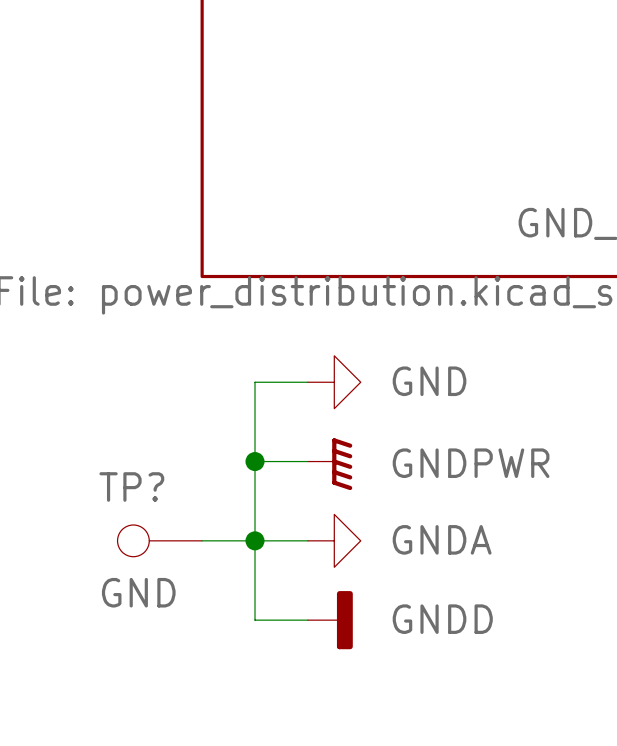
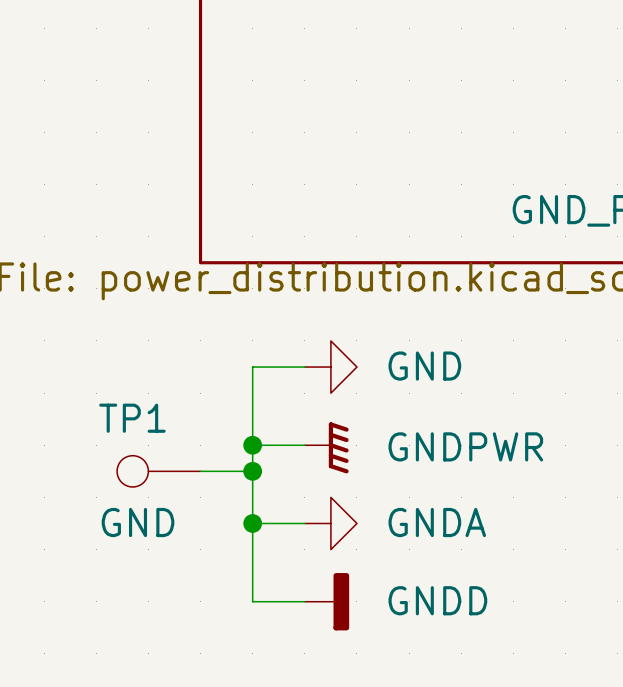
TP1: none -> GND (158, 471)
junction: none -> (252, 471)
TP?: GND (159, 540) -> none
wire: (202, 540) (255, 540) -> (200, 471) (252, 471)

